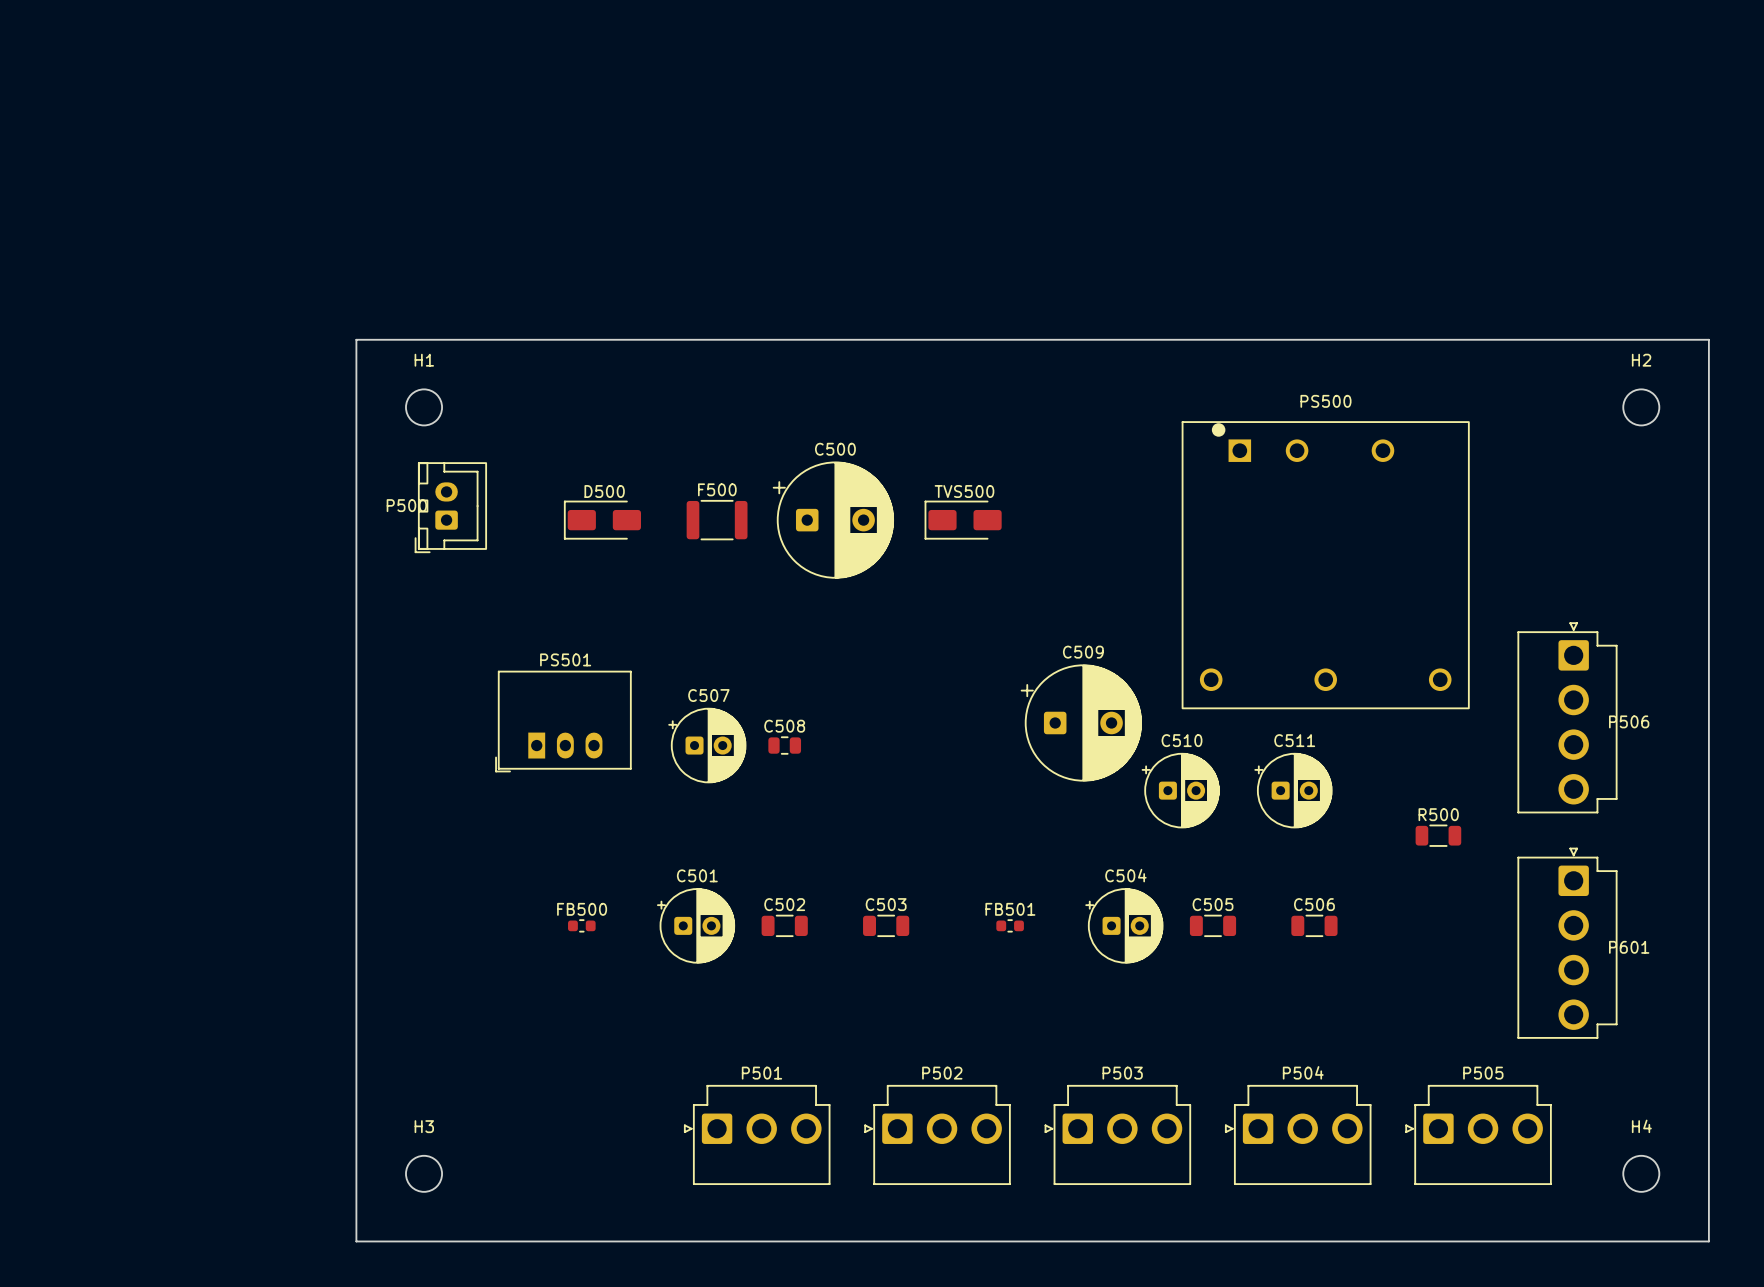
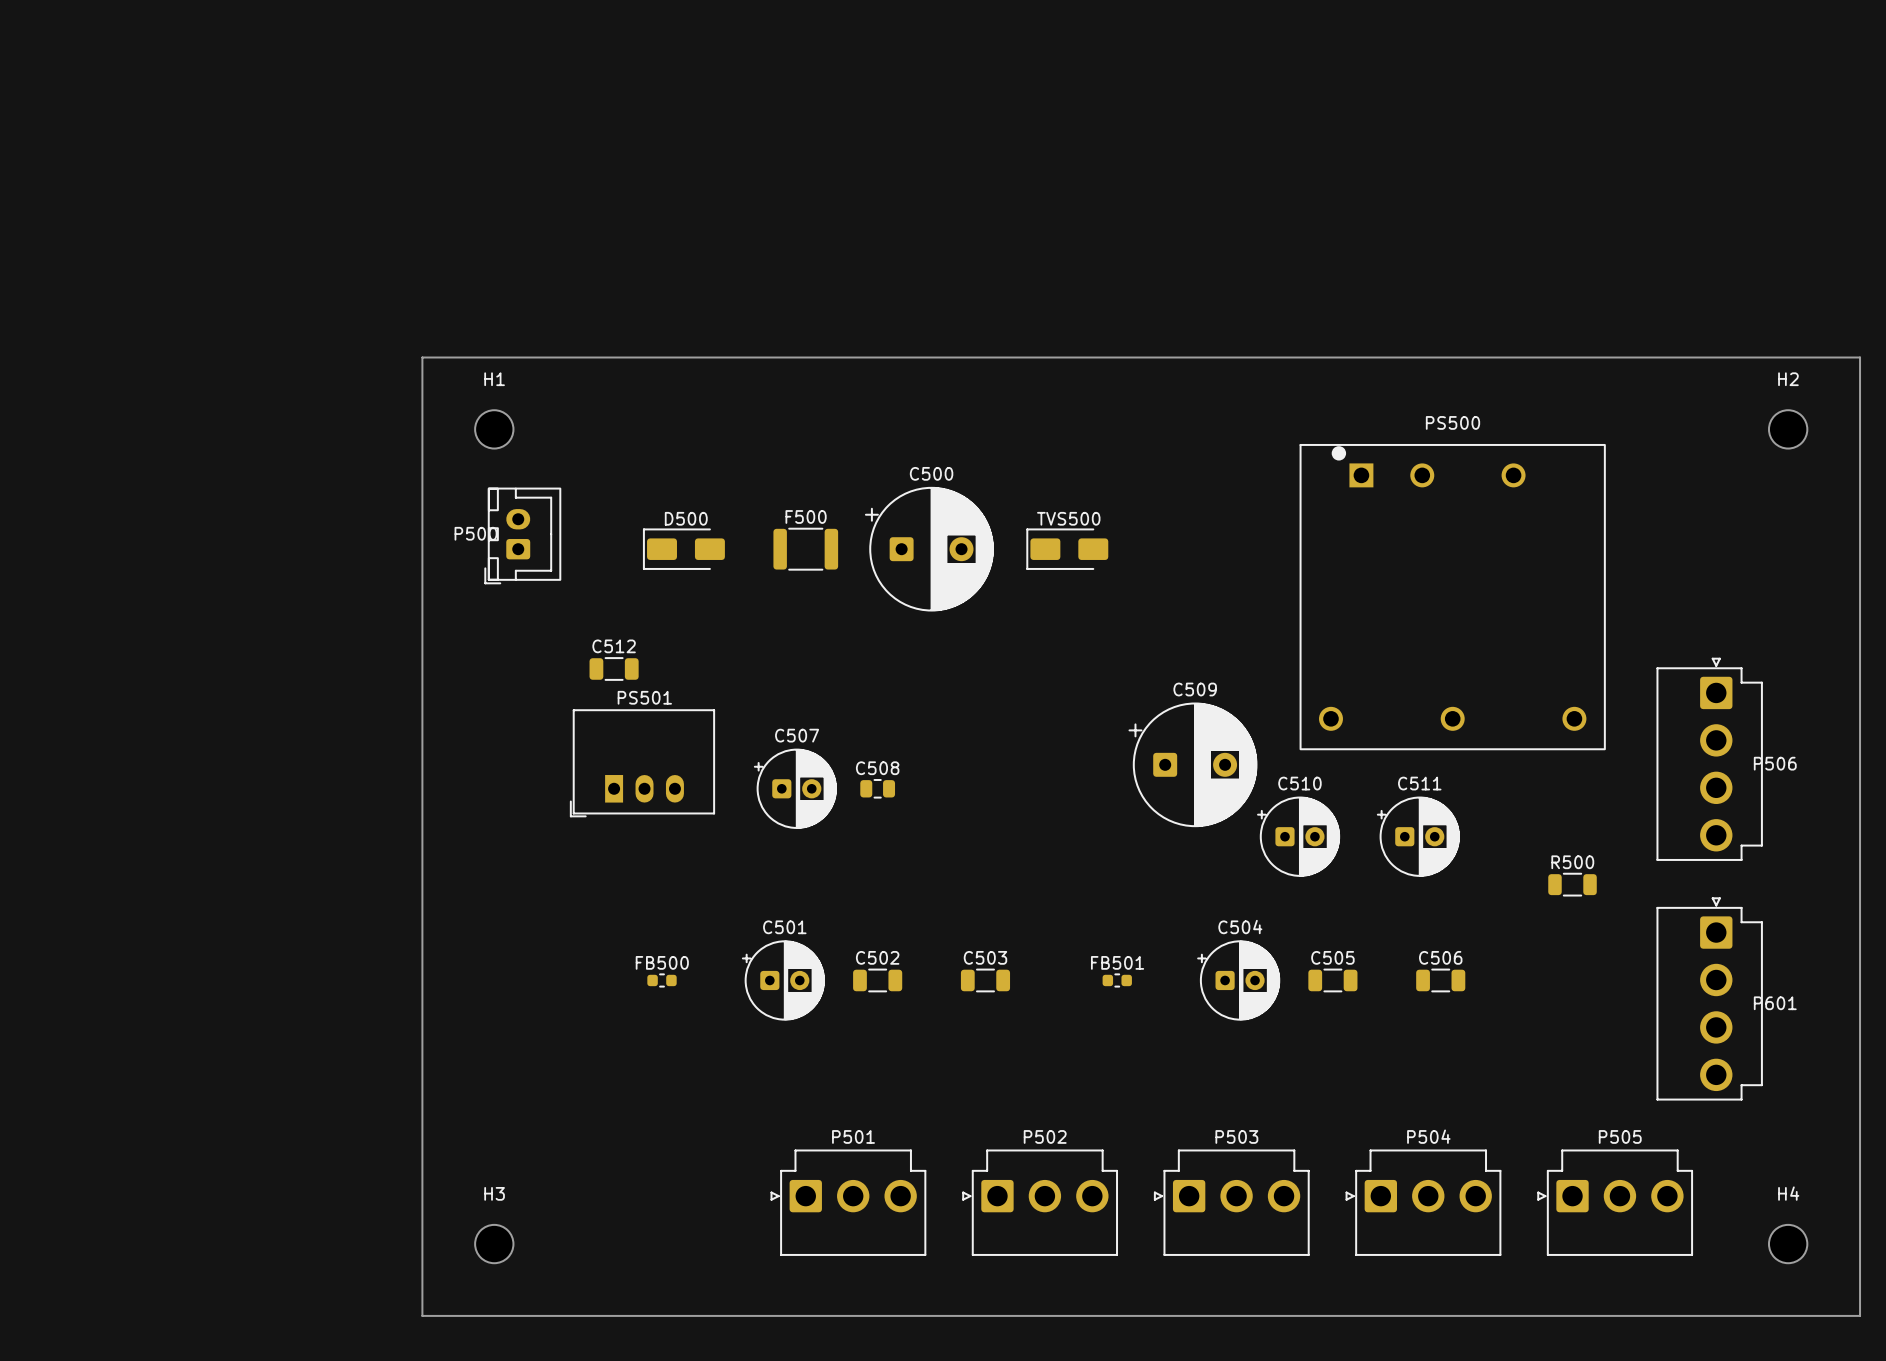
C512: none -> (614, 668)

